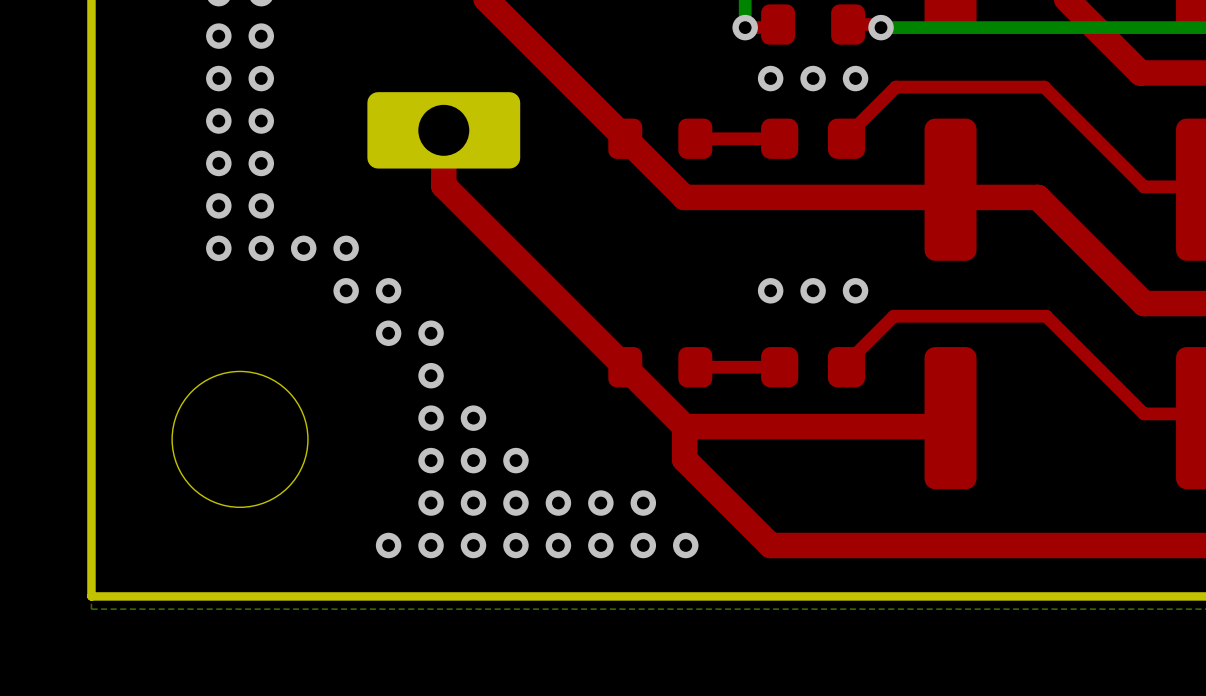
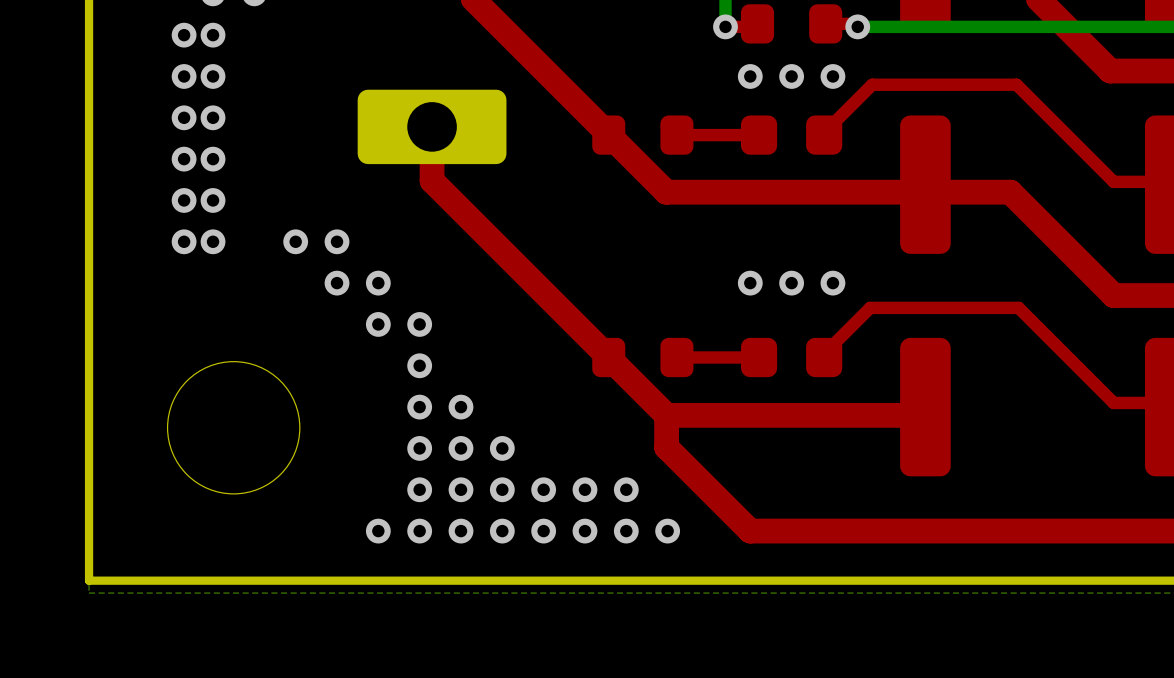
via: none -> (184, 35)
via: (261, 36) -> none
via: none -> (184, 76)
via: (261, 78) -> none
via: none -> (184, 117)
via: (261, 121) -> none
via: none -> (184, 159)
via: (261, 163) -> none
via: none -> (184, 200)
via: (261, 205) -> none
via: none -> (184, 241)
via: (261, 248) -> none

